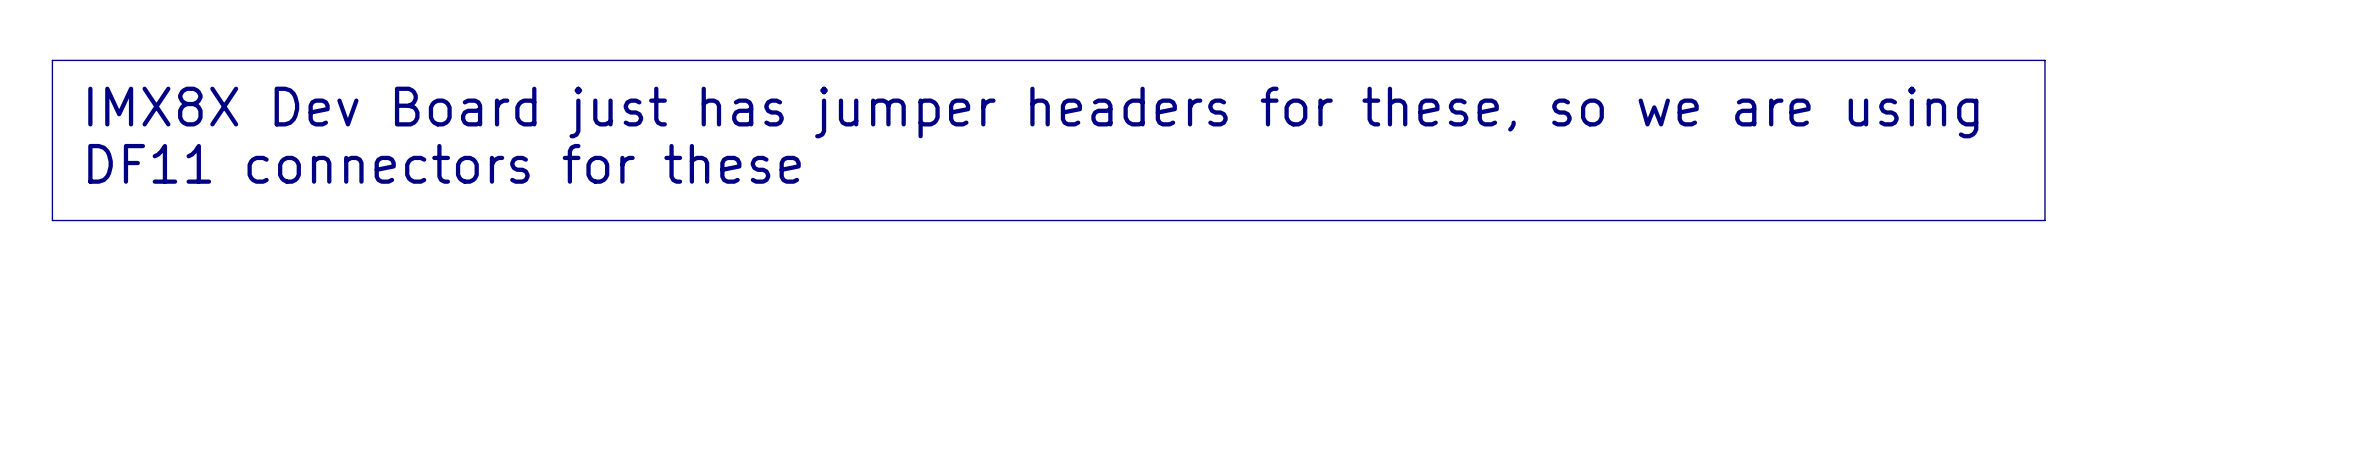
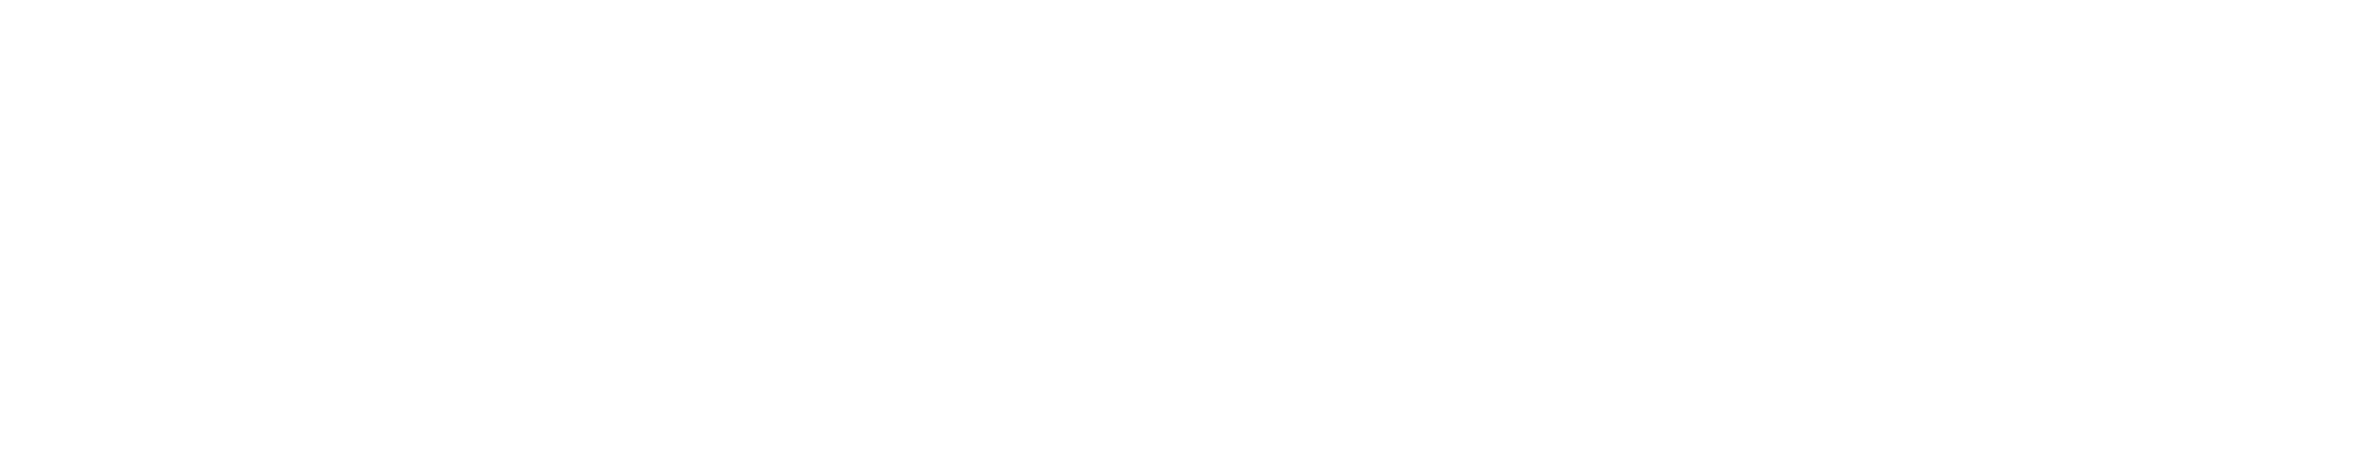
line: (52, 60) (2044, 60) (2044, 220) (52, 220) (52, 60) -> none
text: IMX8X Dev Board just has jumper headers for these, so we are using (1033, 112) -> none
text: DF11 connectors for these (444, 163) -> none

